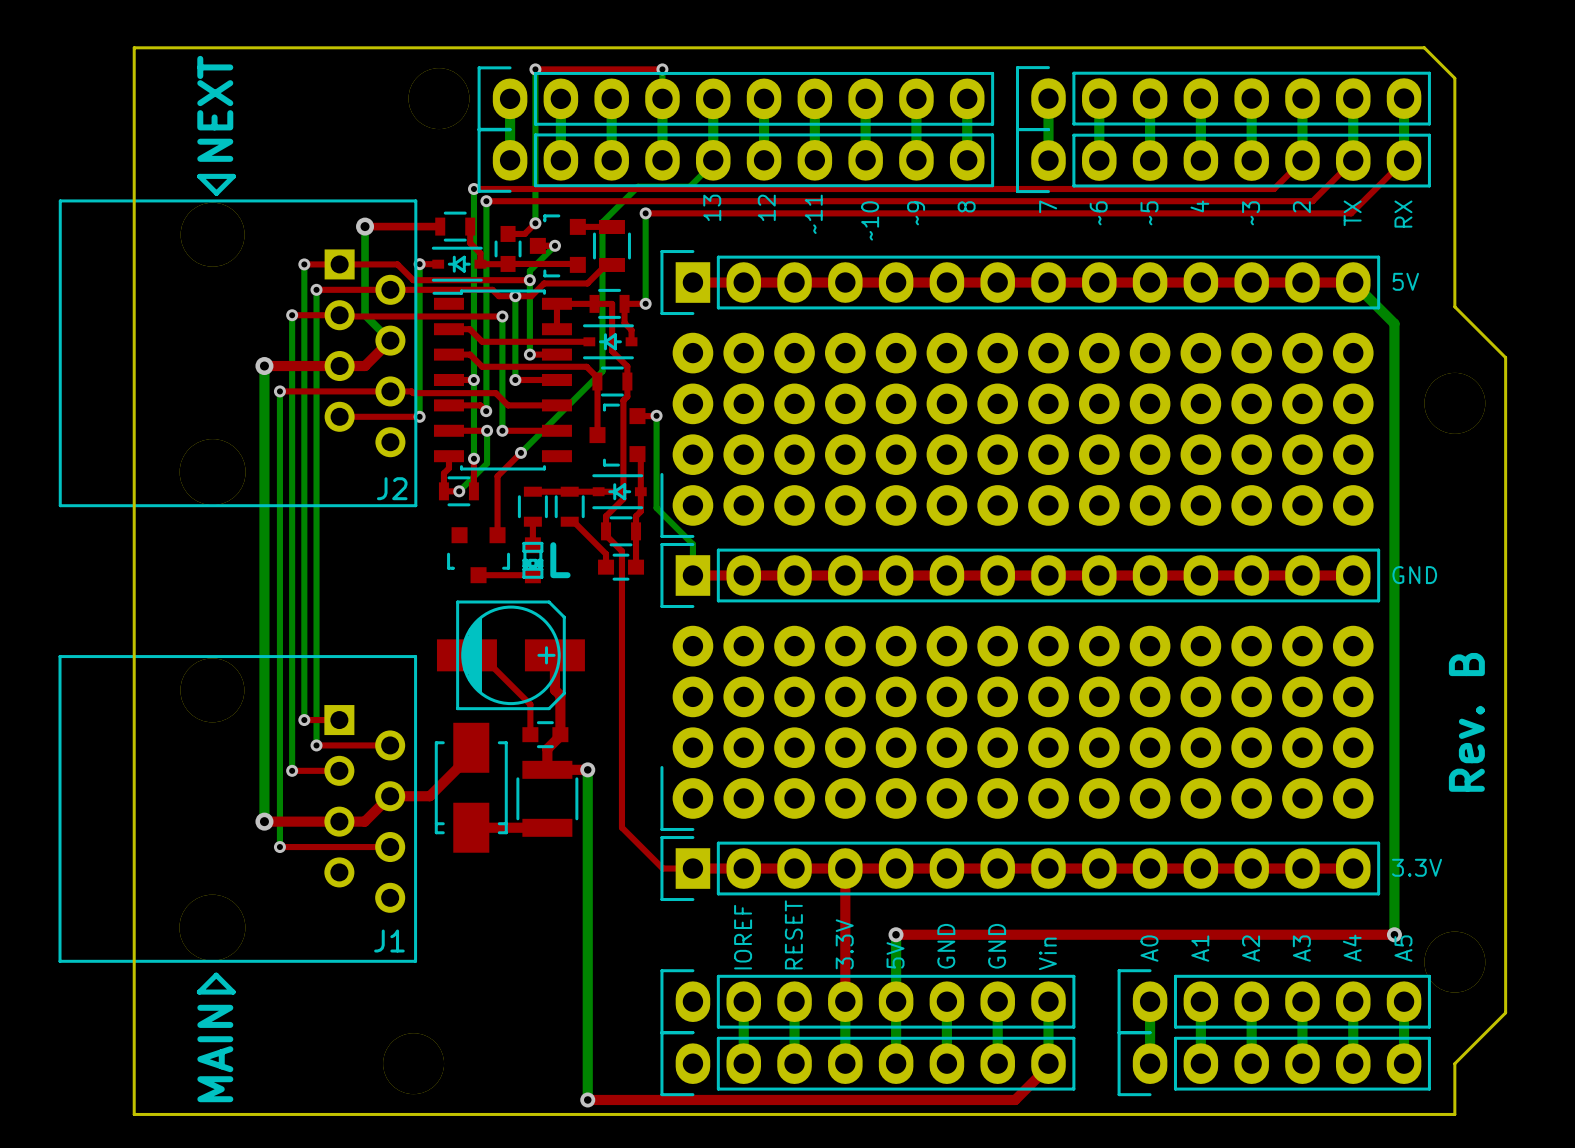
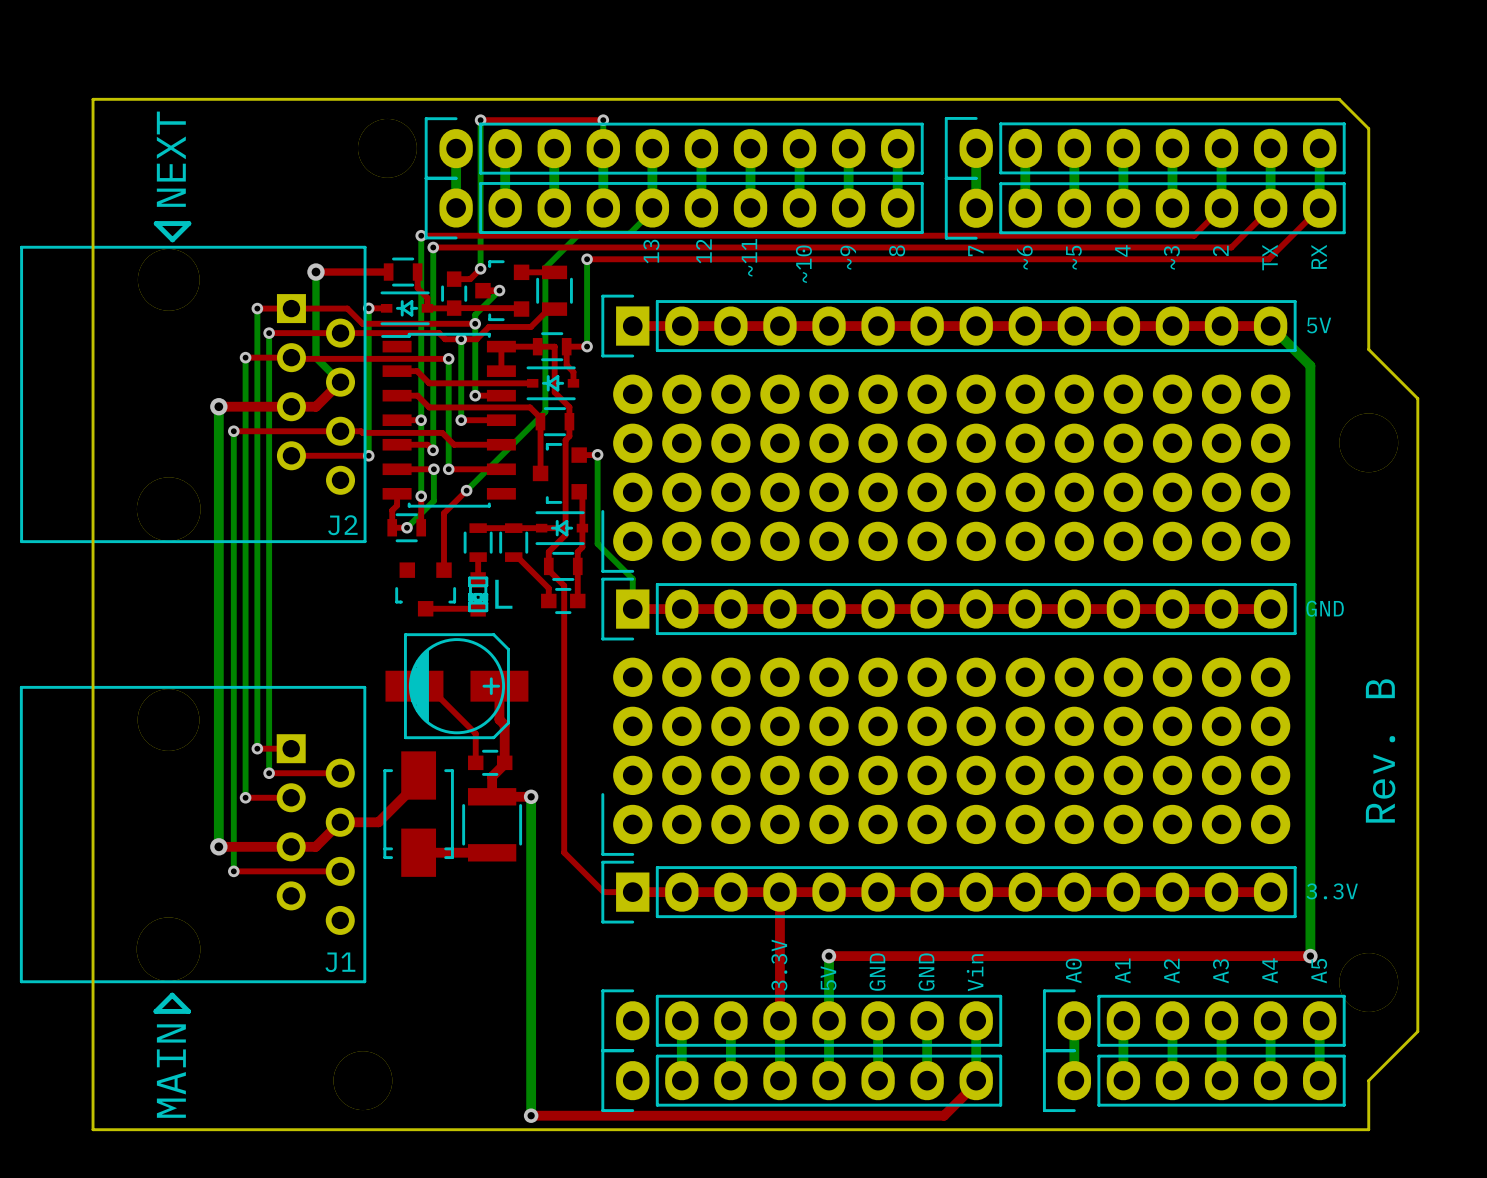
text: RESET (793, 934) -> none
text: IOREF (743, 937) -> none

